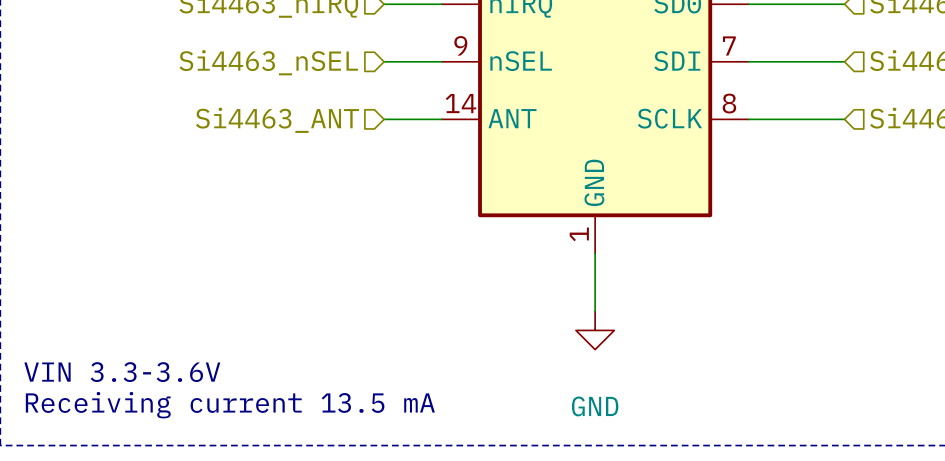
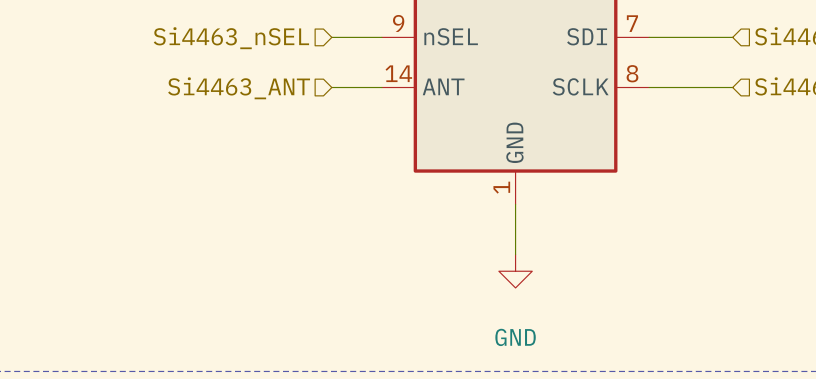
text: VIN 3.3-3.6V (122, 372) -> none
text: Receiving current 13.5 mA (230, 405) -> none

